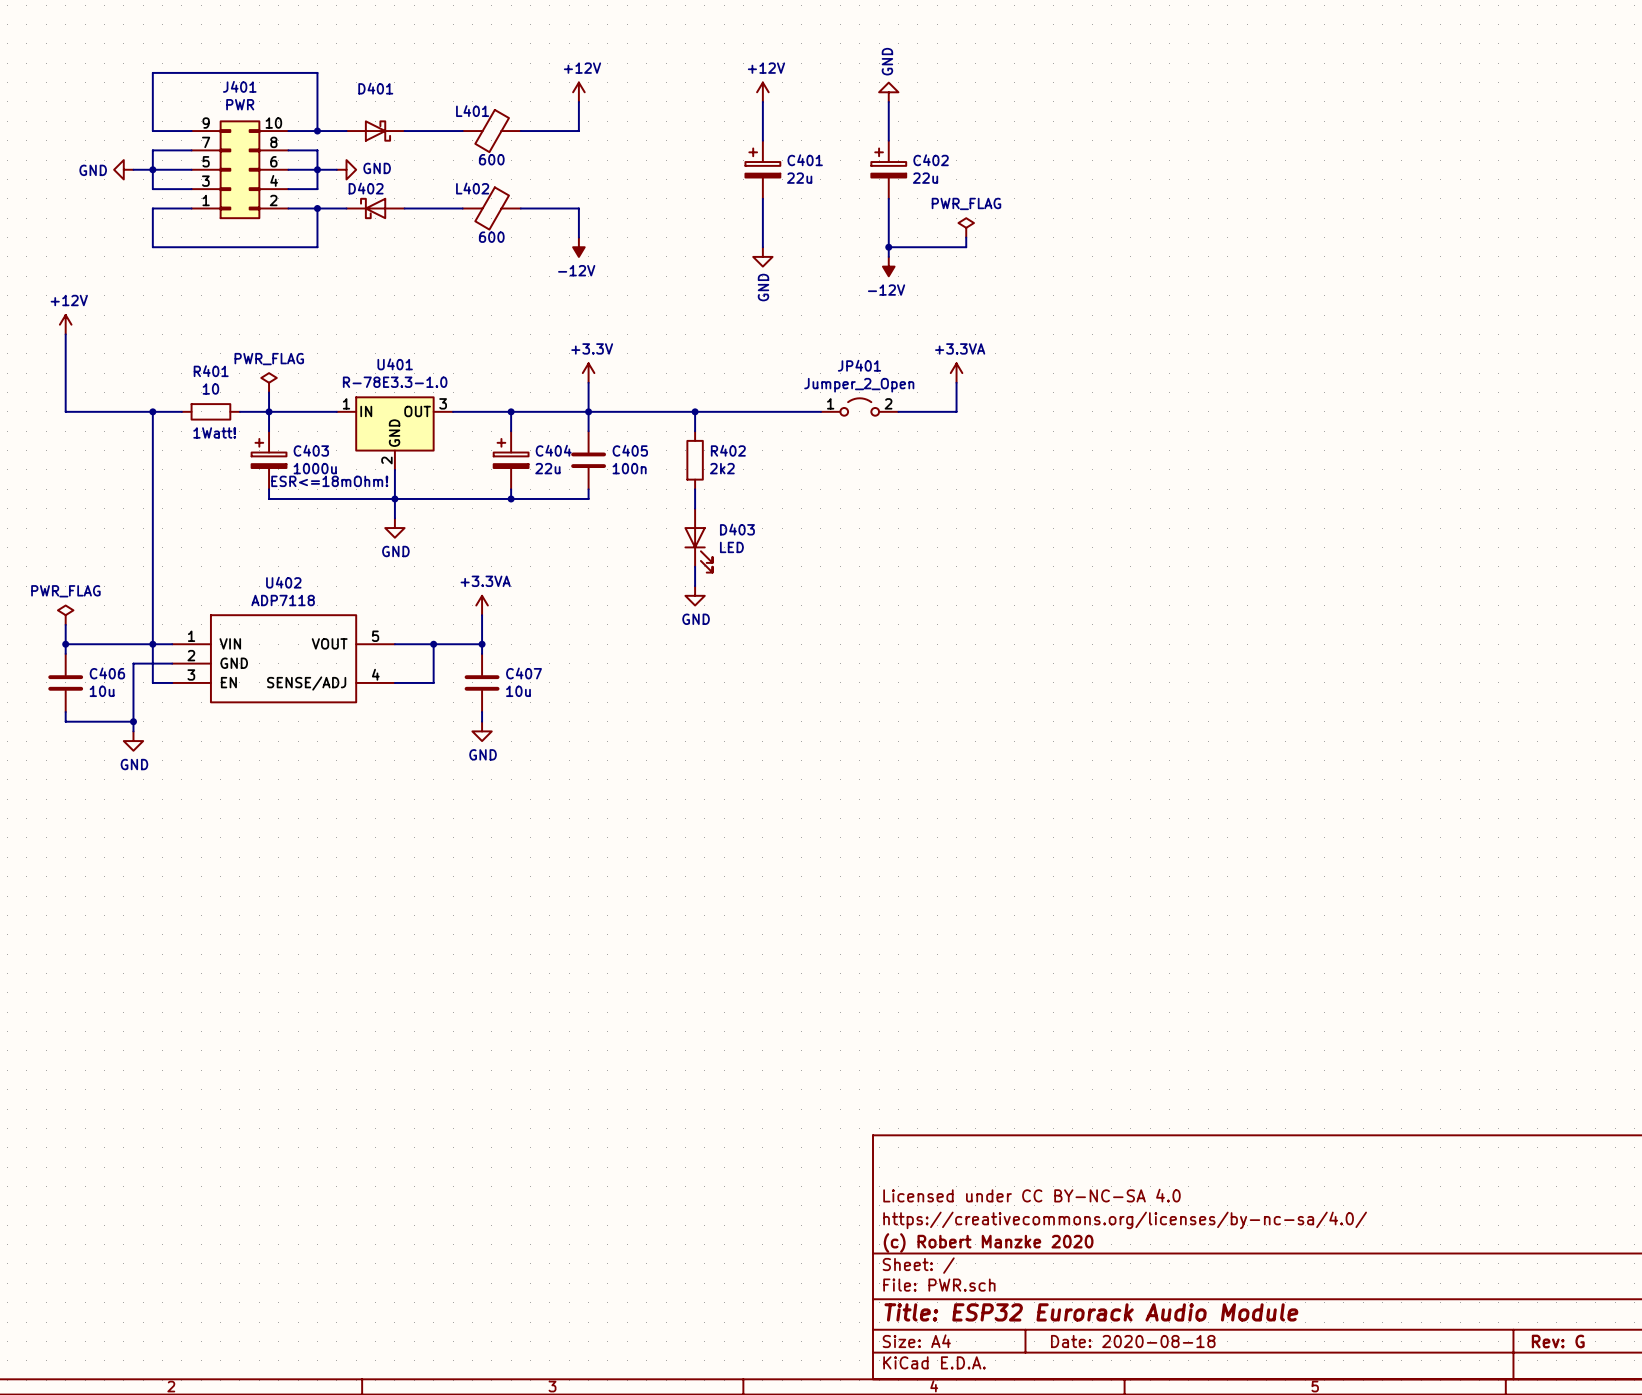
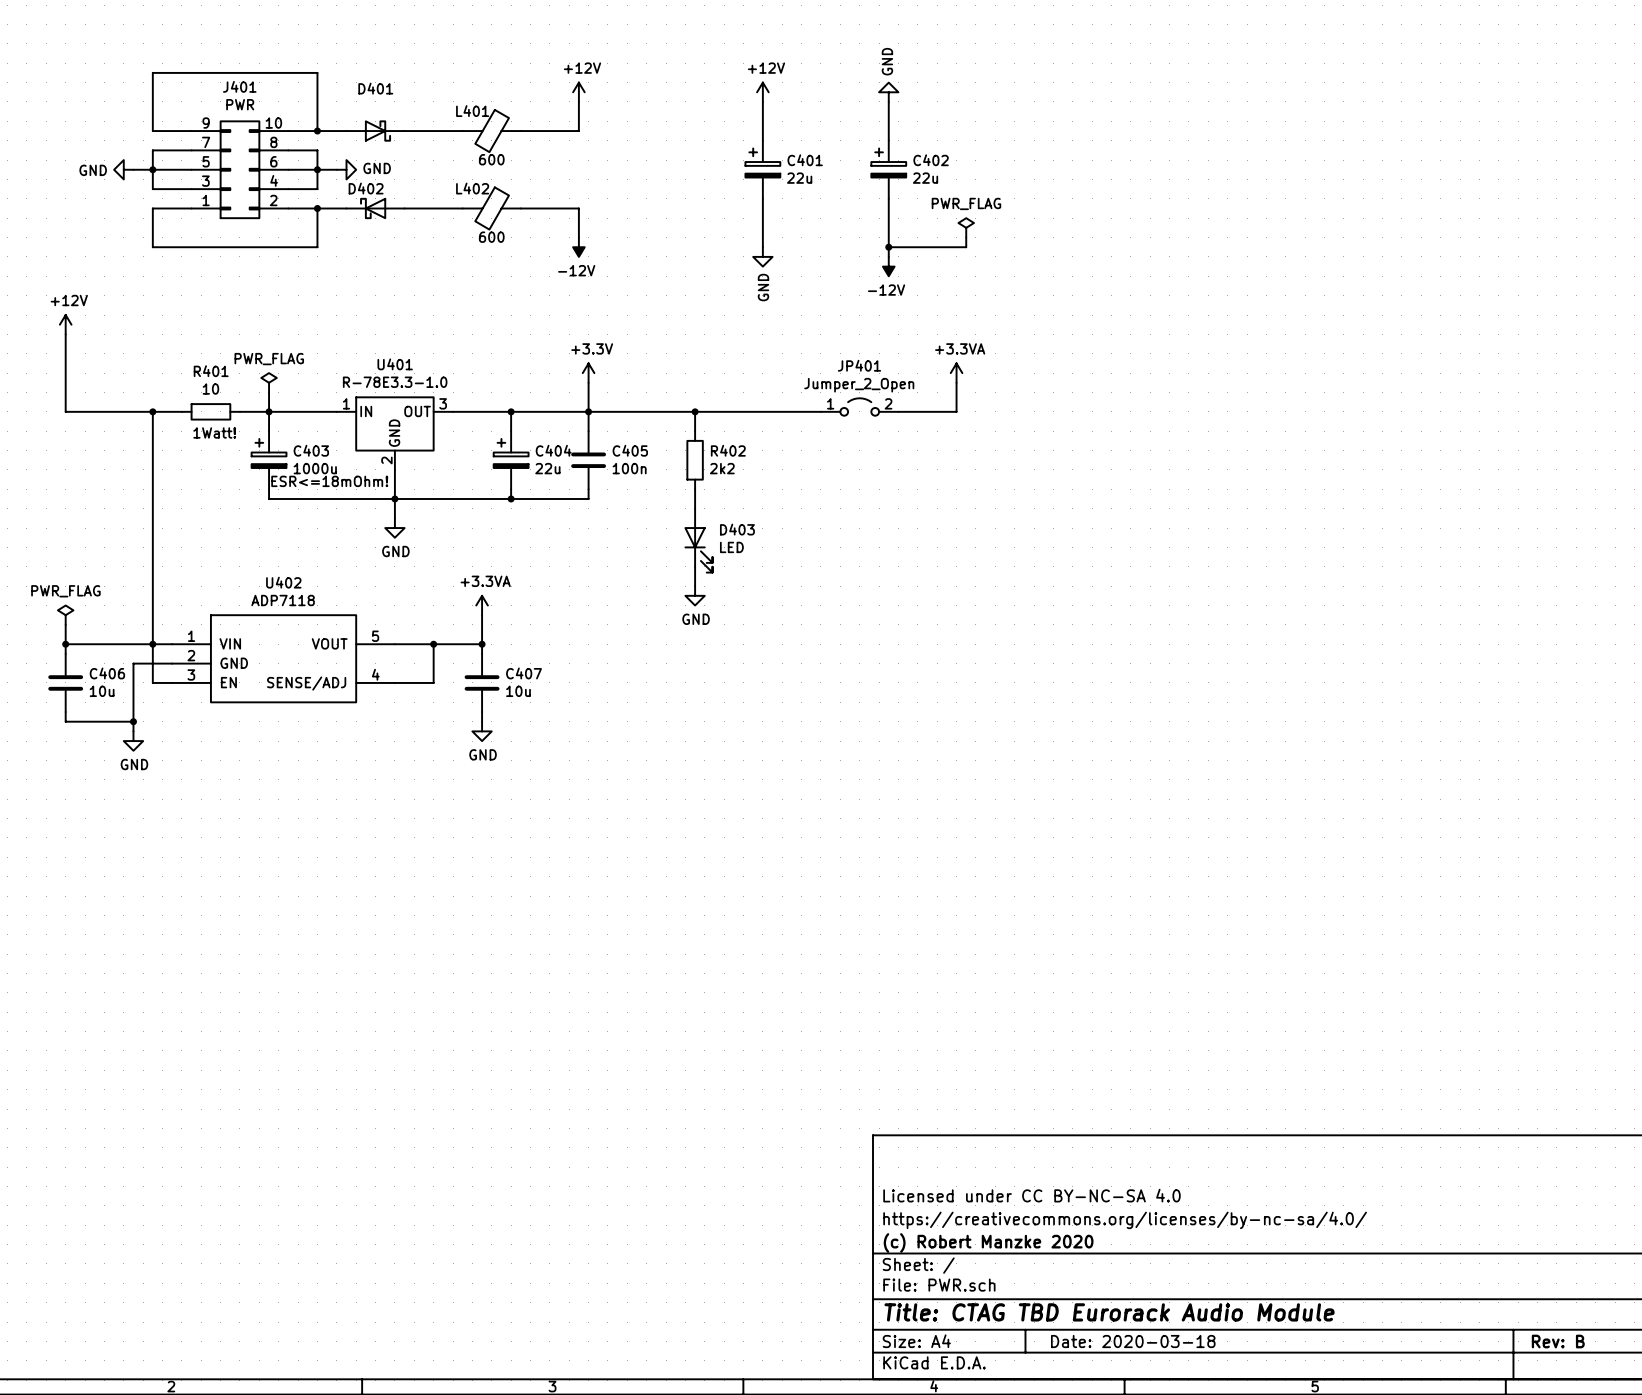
title block: Title: ESP32 Eurorack Audio Module (1091, 1312) -> Title: CTAG TBD Eurorack Audio Module (1109, 1312)
title block: Date: 2020-08-18 (1133, 1341) -> Date: 2020-03-18 (1133, 1341)
title block: Rev: G (1558, 1341) -> Rev: B (1558, 1341)

